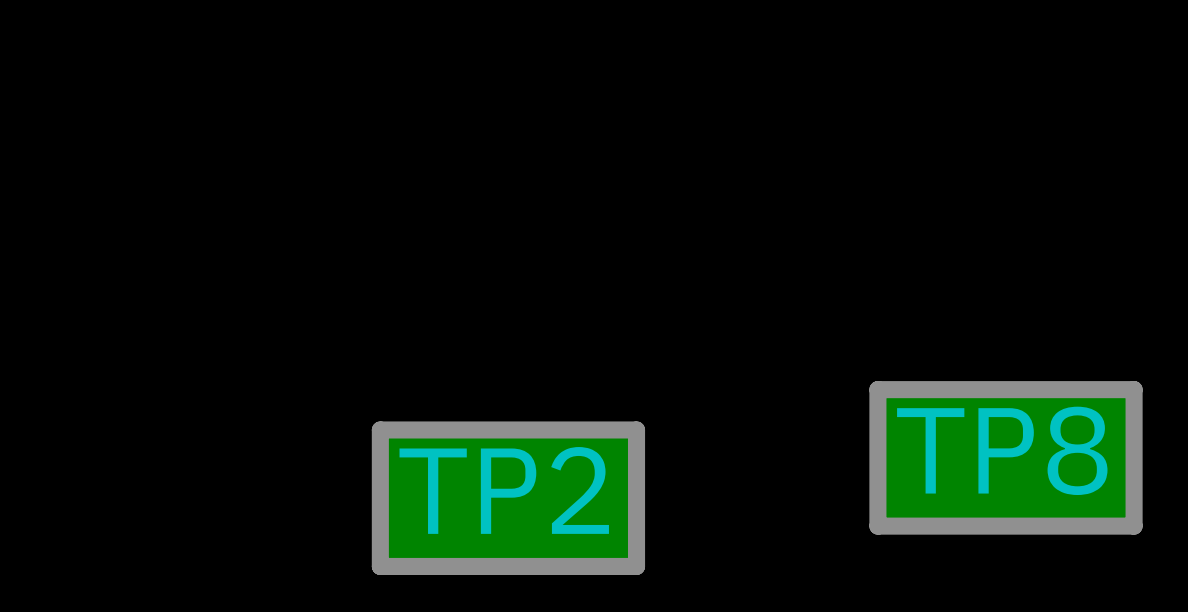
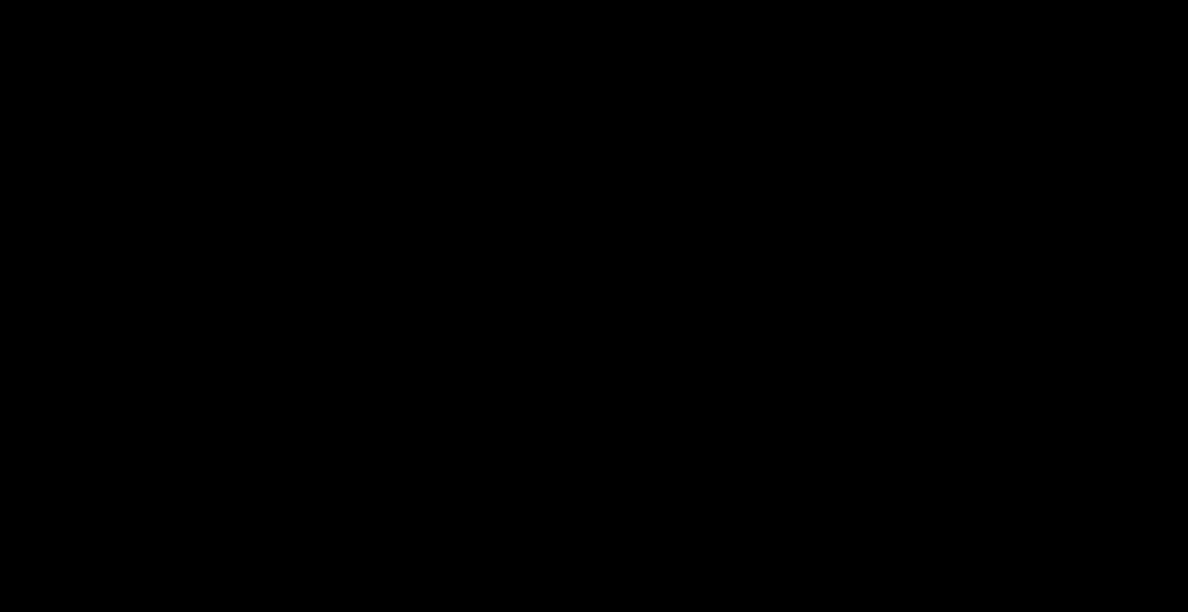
TP8: (1006, 457) -> none
TP2: (508, 498) -> none

